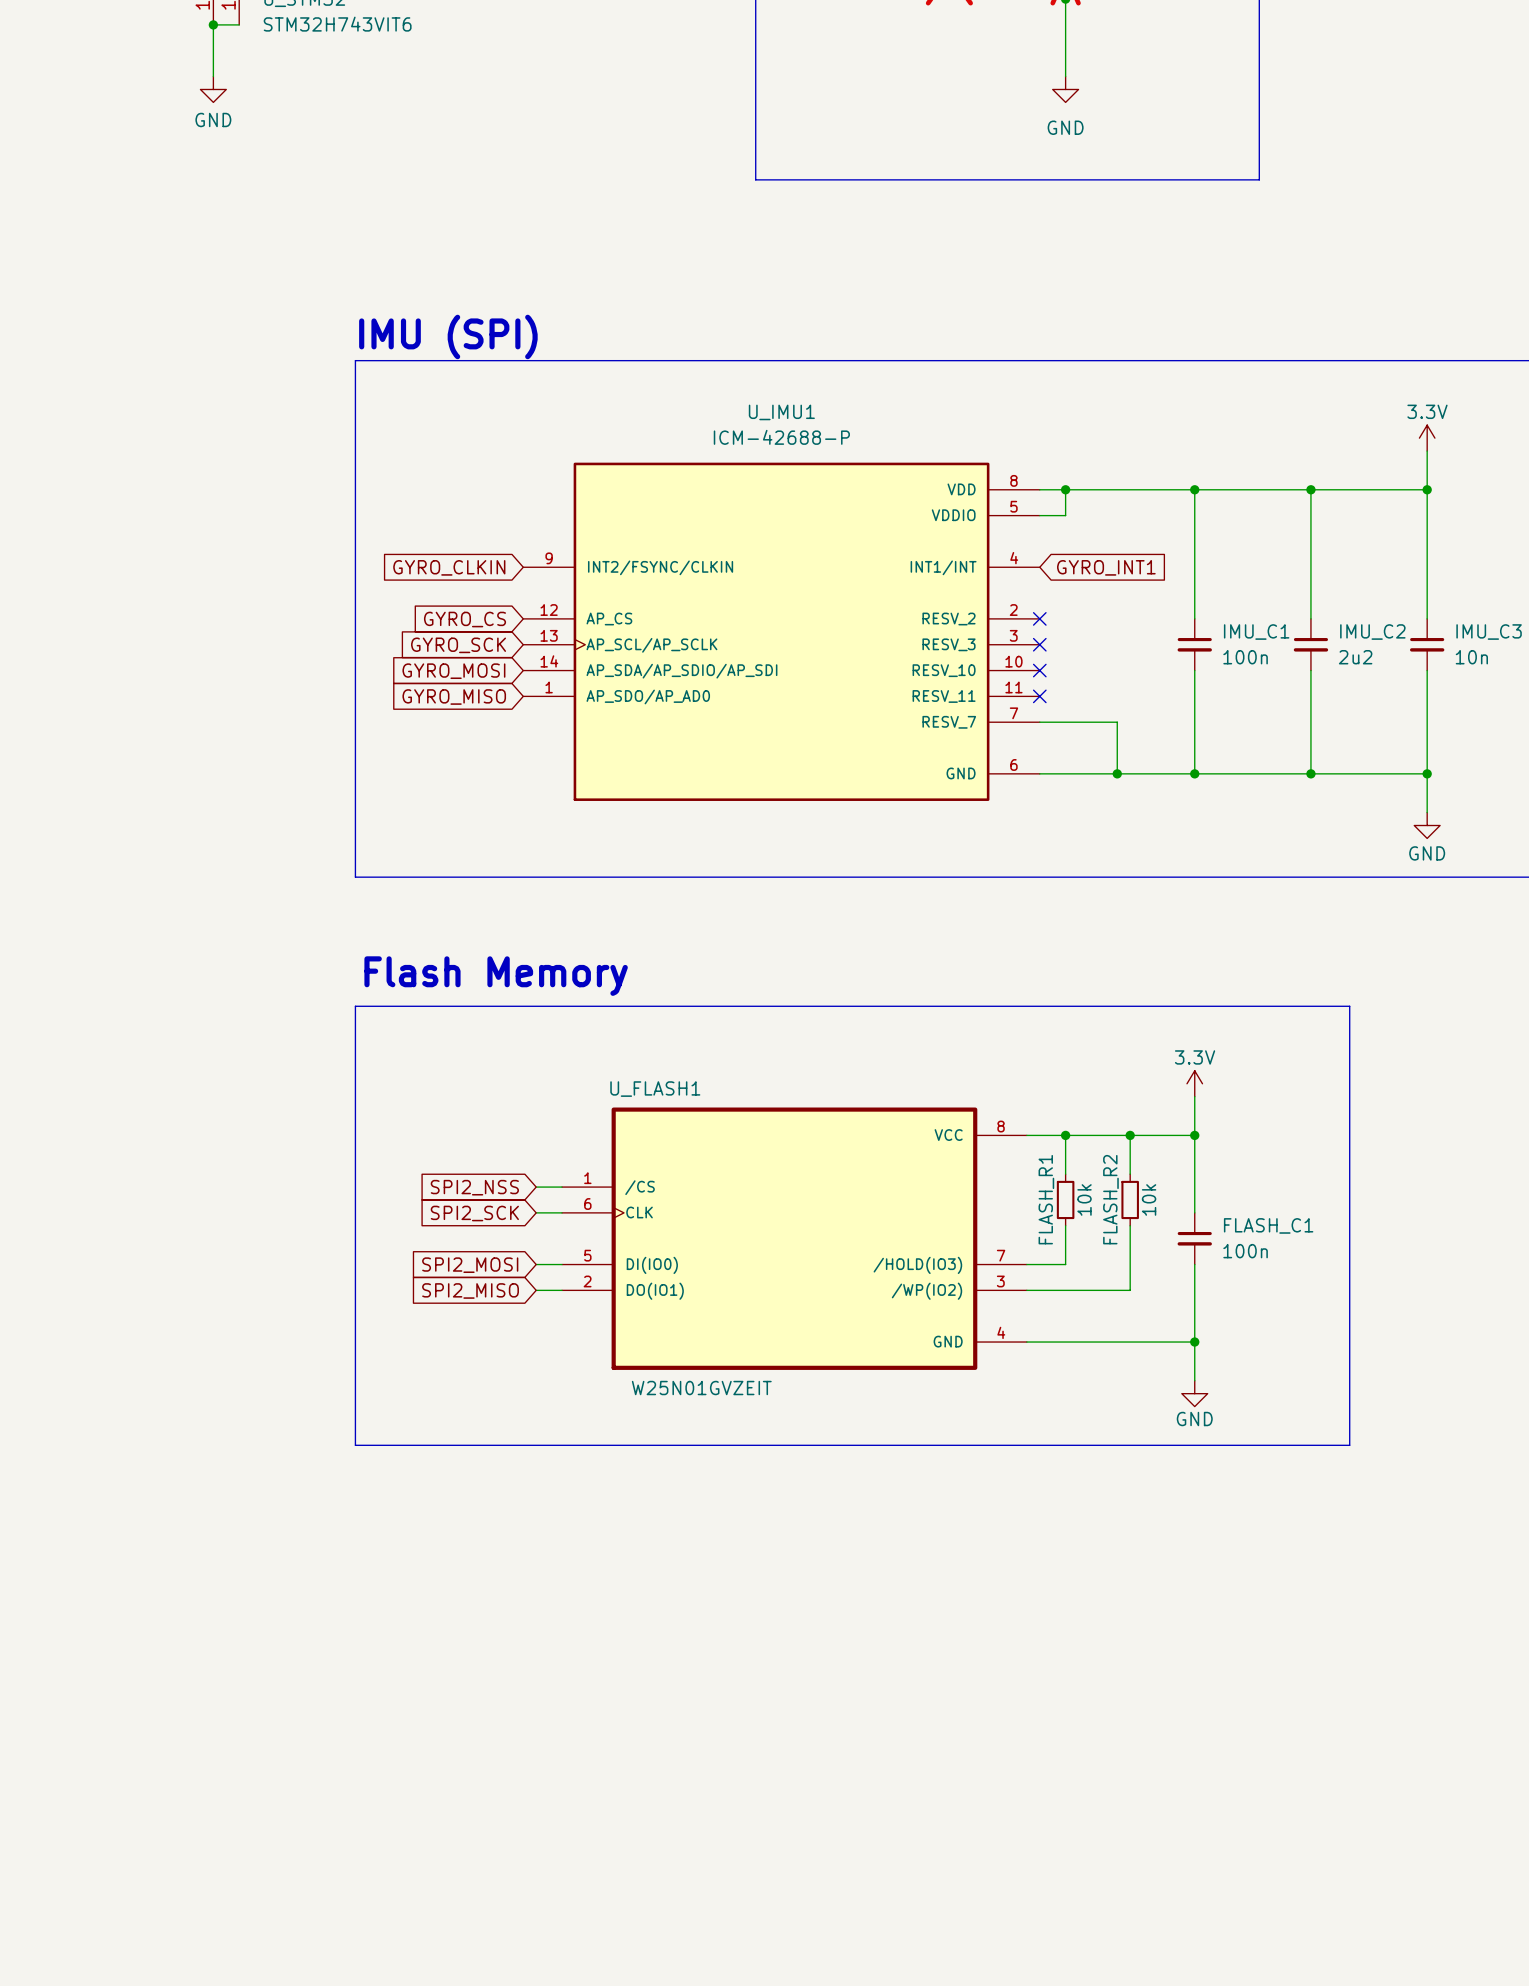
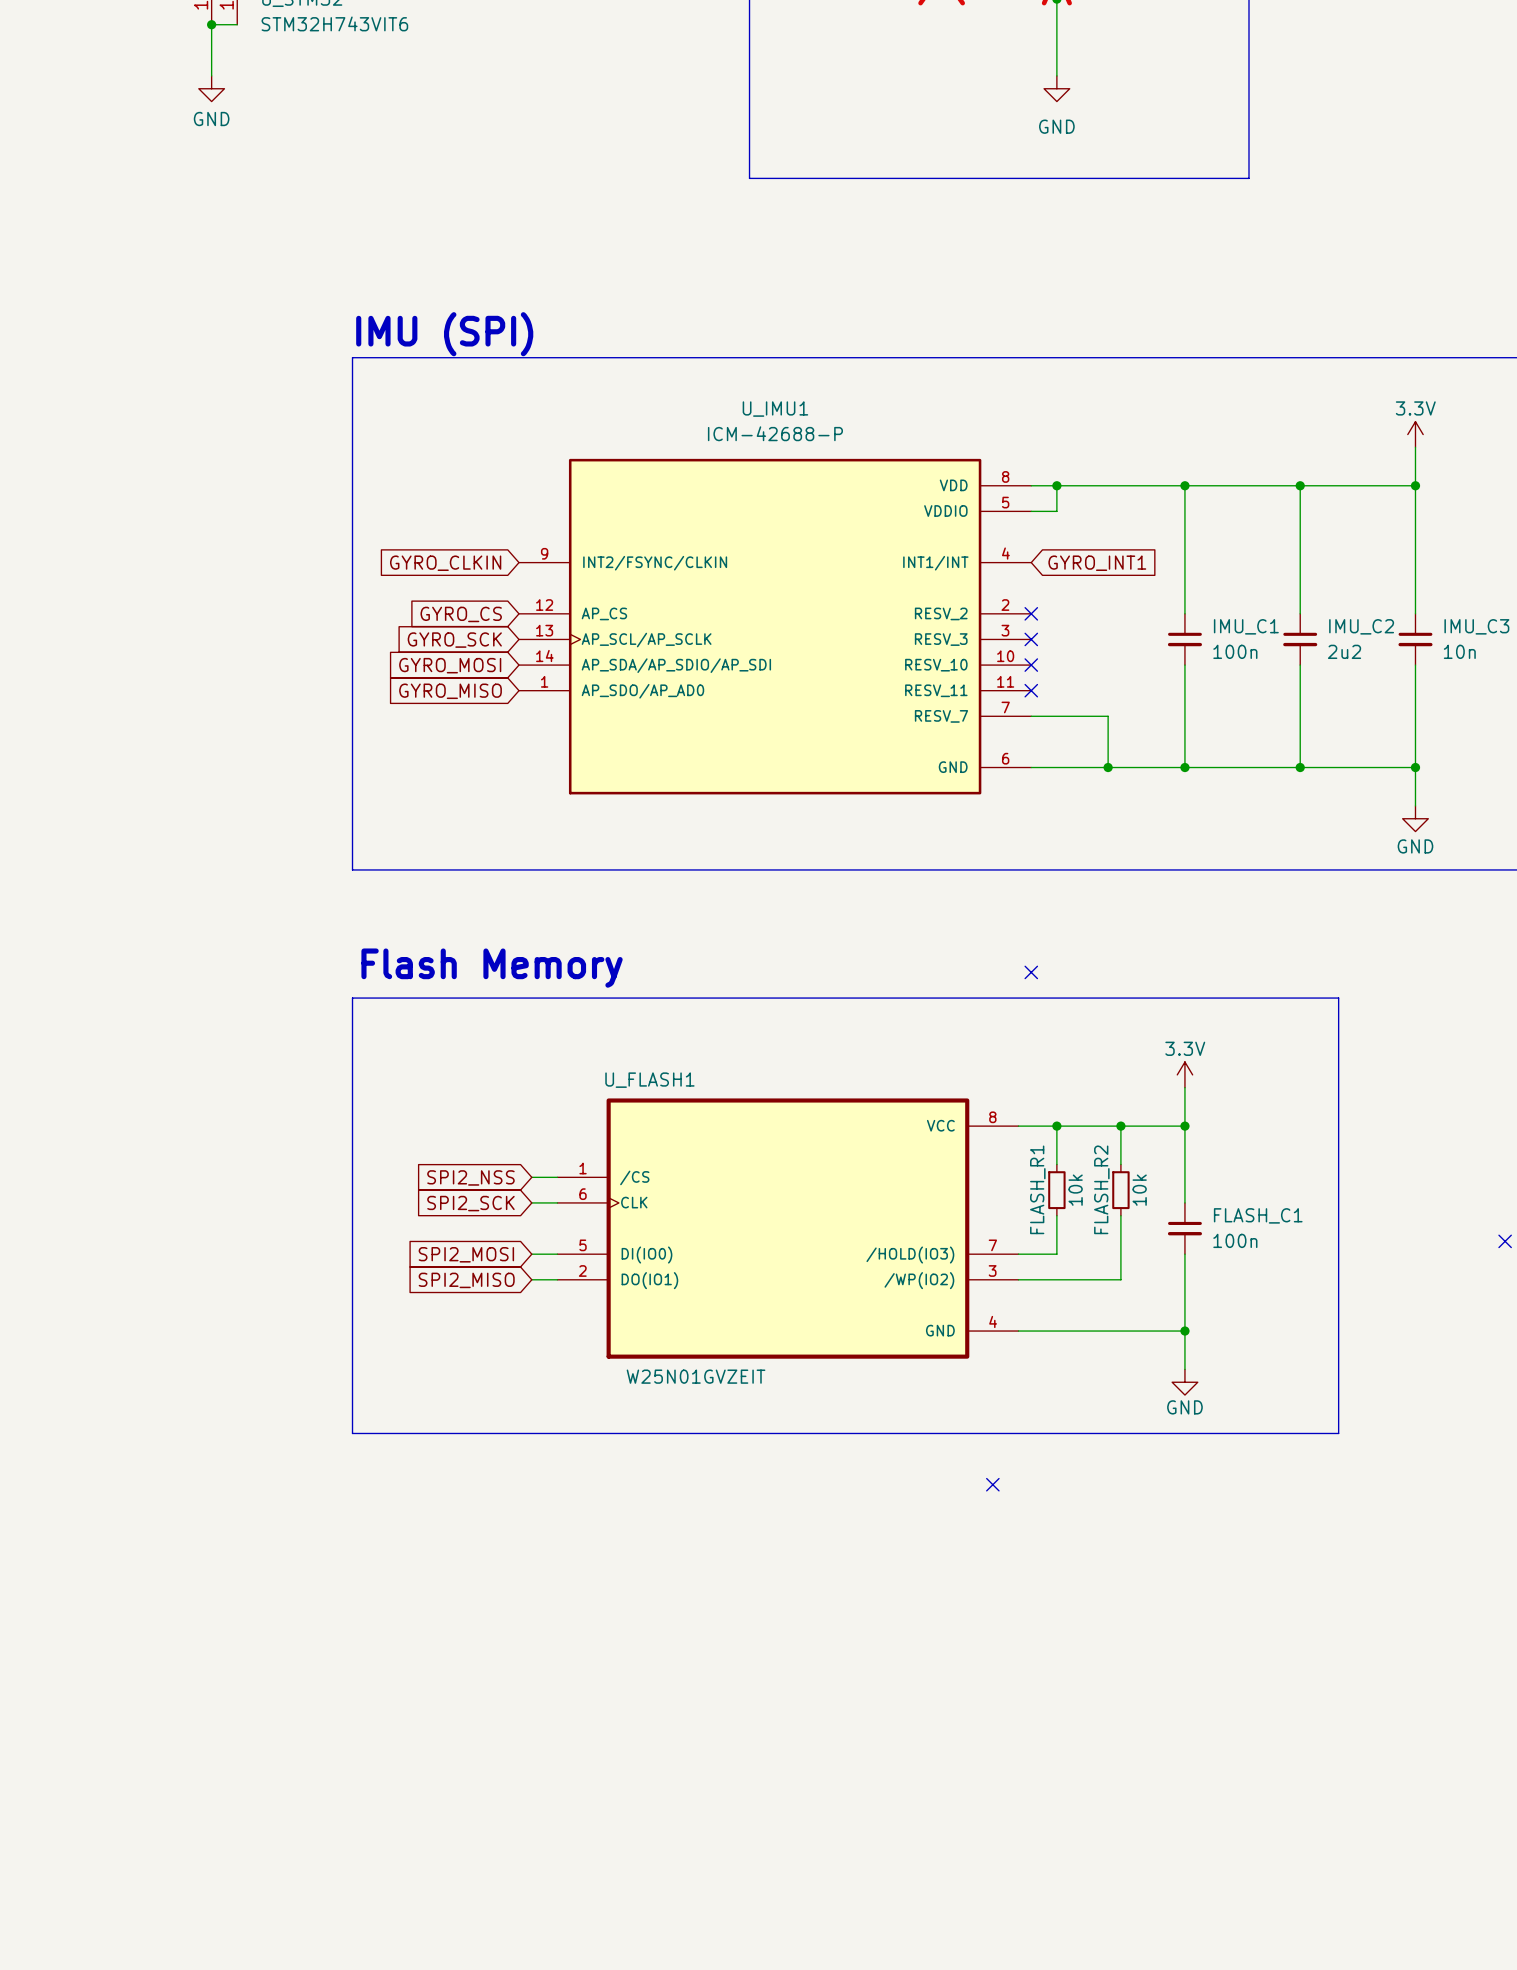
no-connect mark: none -> (1031, 972)
no-connect mark: none -> (1505, 1241)
no-connect mark: none -> (992, 1484)

